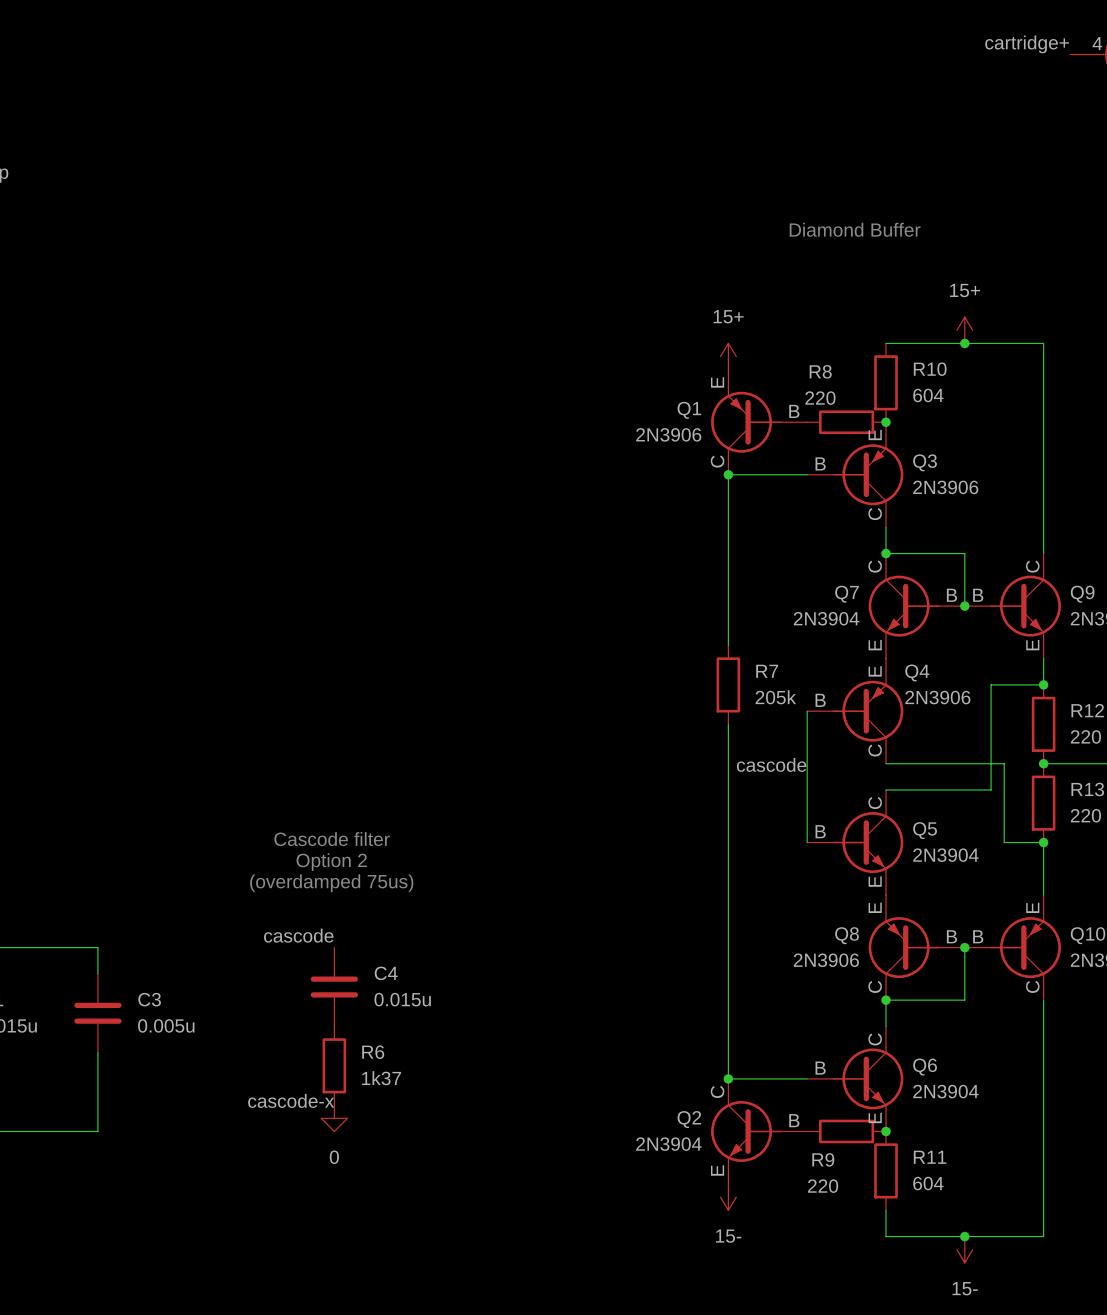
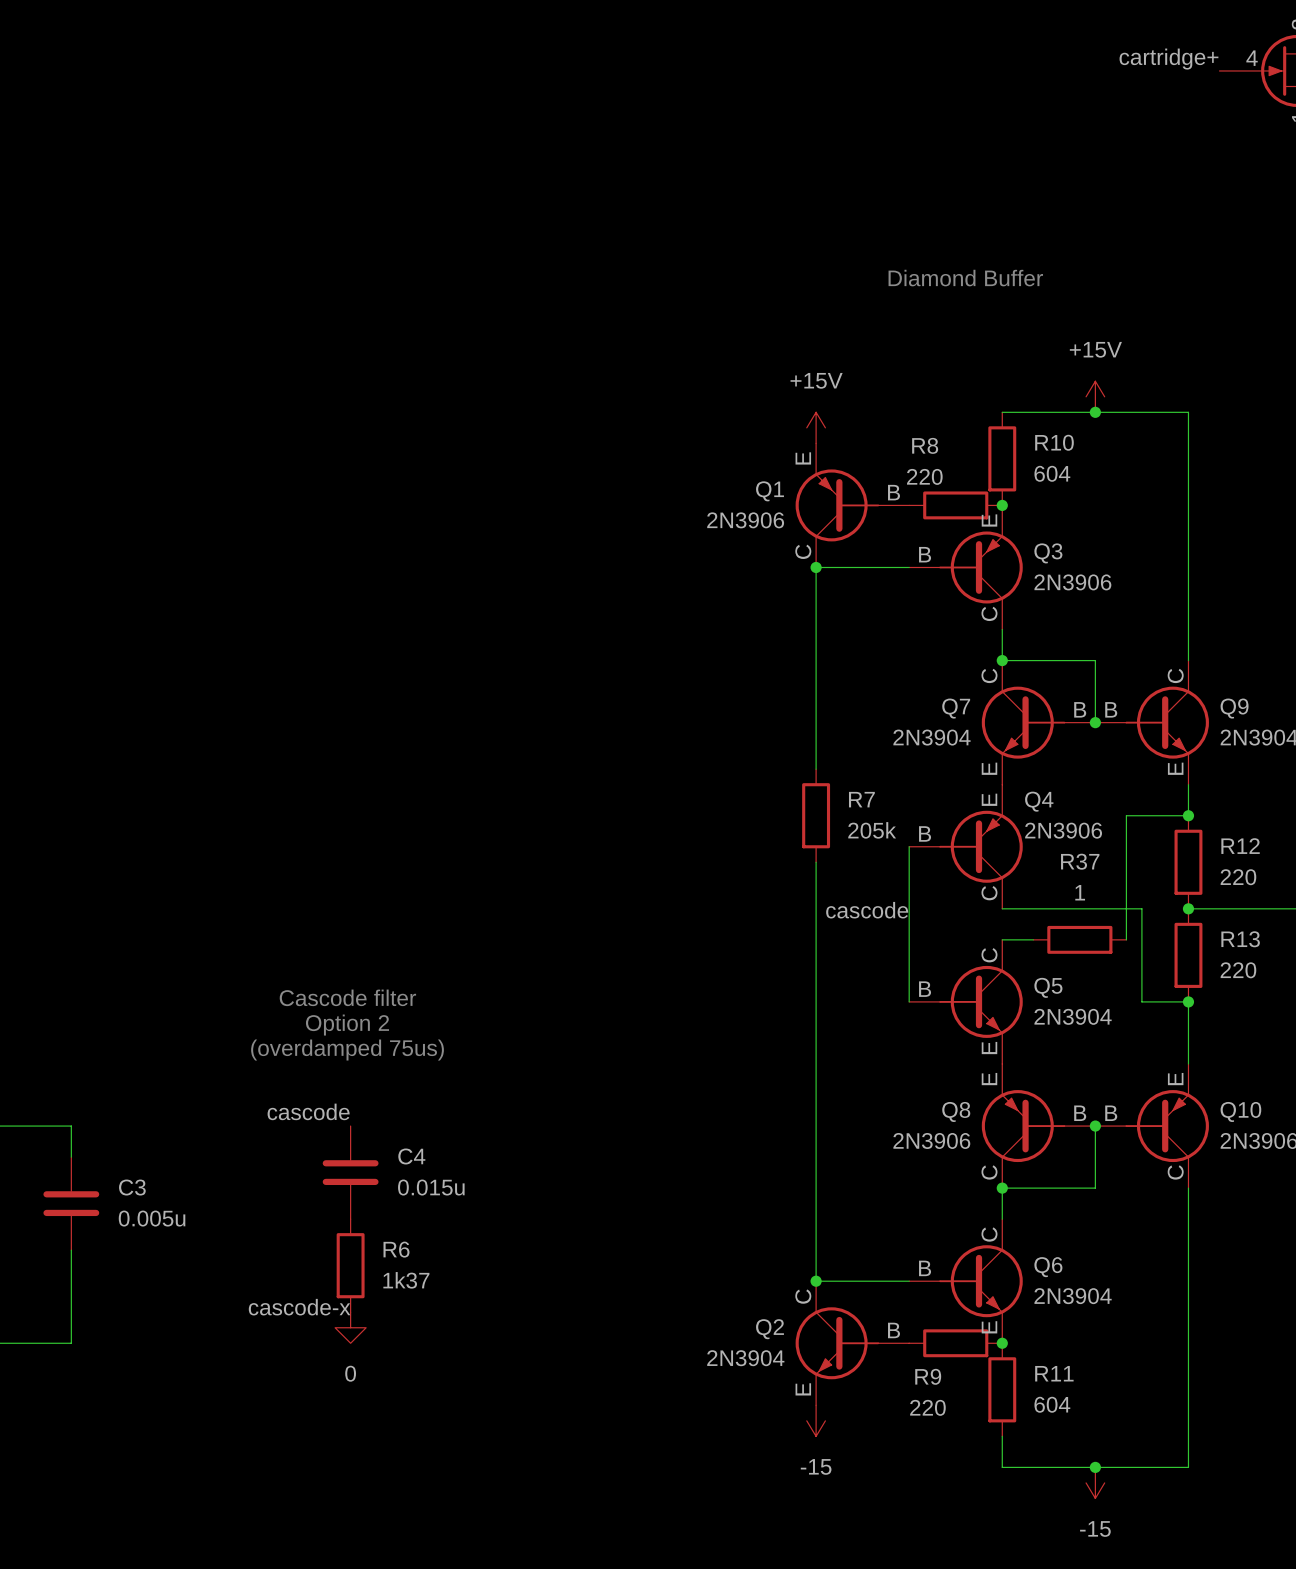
power symbol: 15+ (964, 330) -> +15V (1095, 396)
power symbol: 15+ (728, 356) -> +15V (816, 427)
wire: (912, 789) (991, 789) -> none
R37: none -> 1 (1079, 939)
power symbol: 15- (728, 1197) -> -15 (816, 1420)
power symbol: 15- (964, 1249) -> -15 (1095, 1482)

